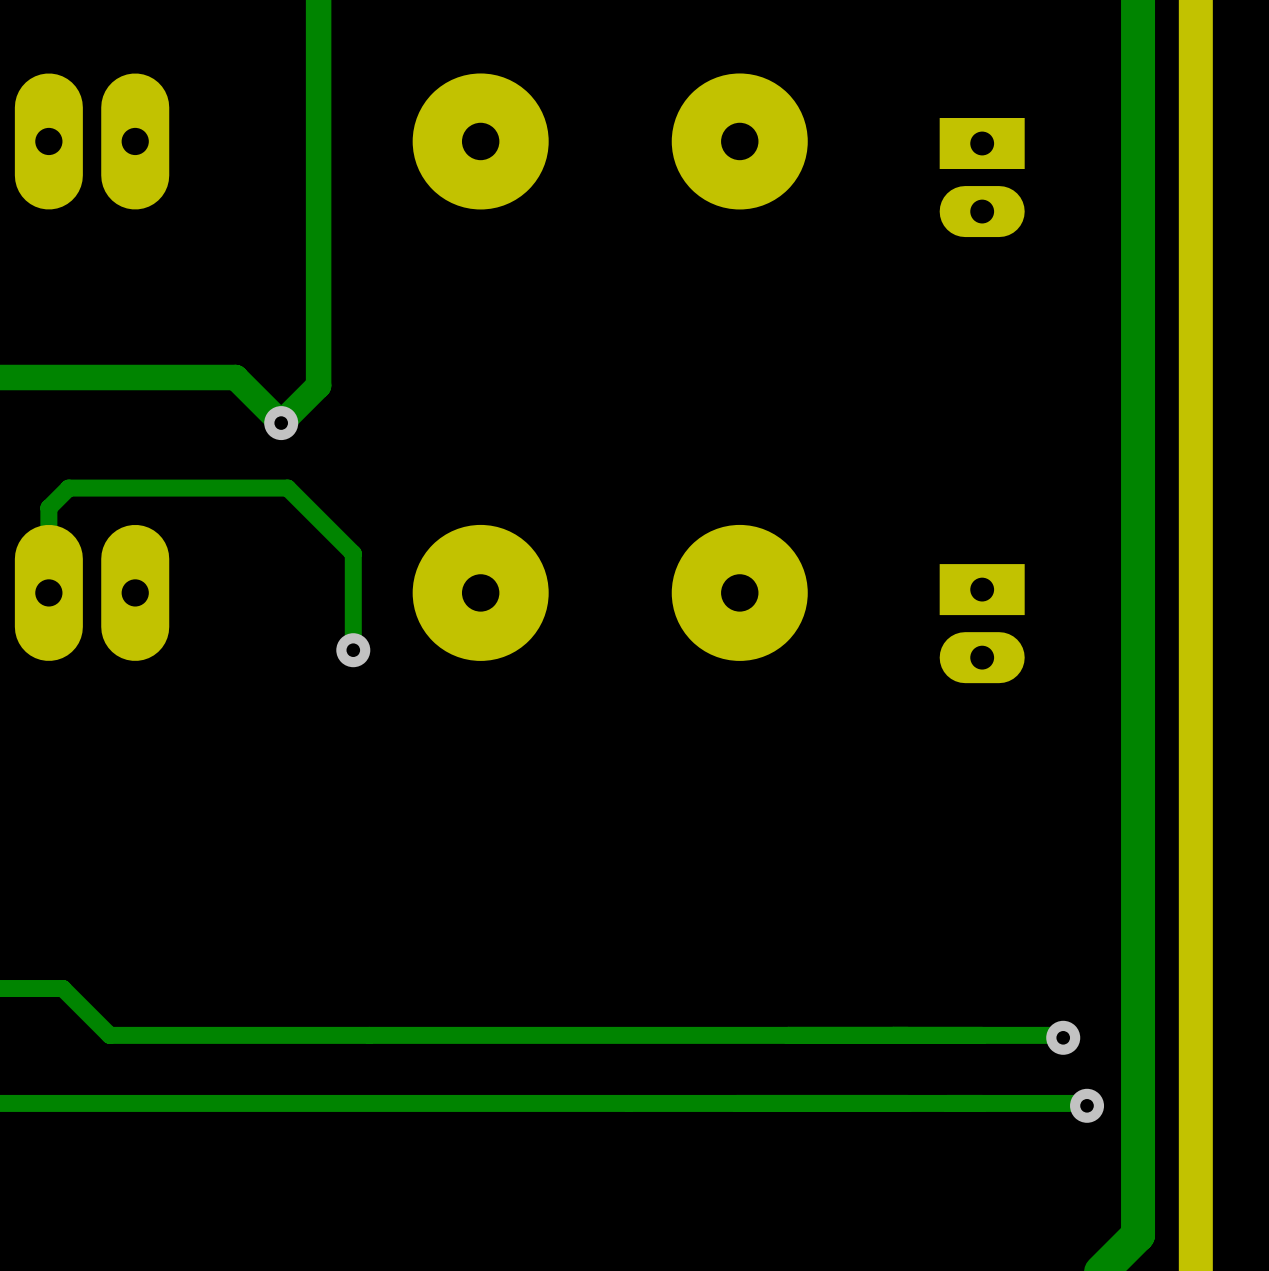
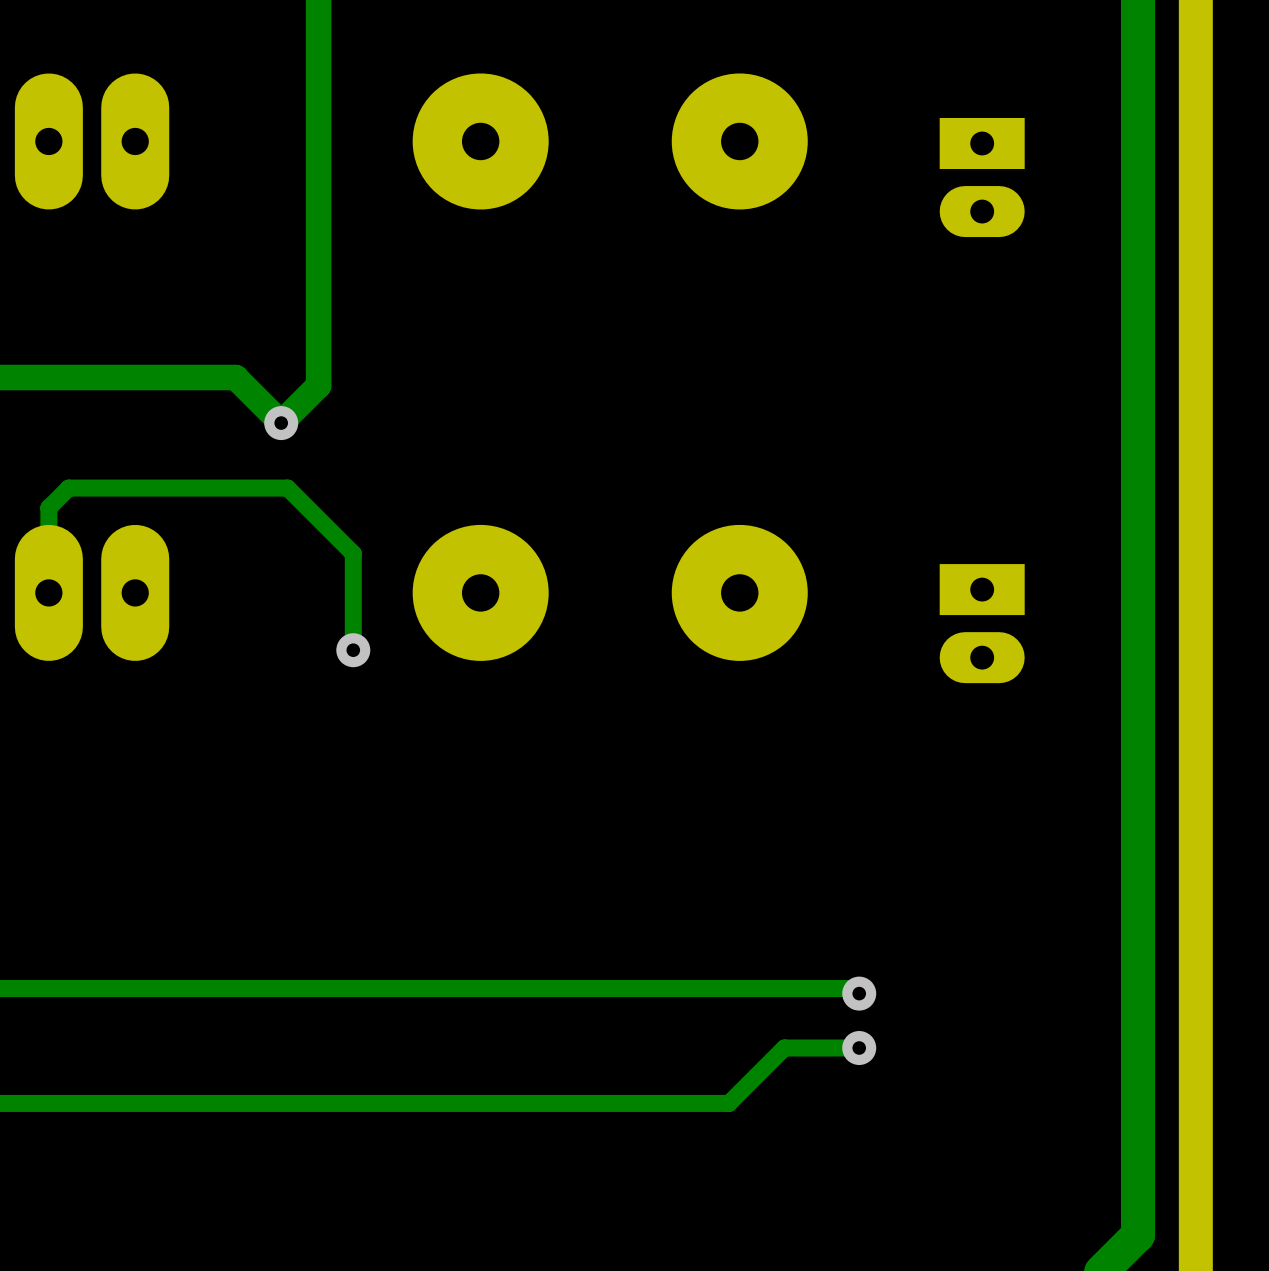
track: (62, 988) (109, 1035) (1060, 1035) (1063, 1037) -> (62, 988) (854, 988) (859, 993)
via: none -> (859, 993)
via: (1063, 1037) -> none
via: none -> (859, 1048)
track: (729, 1103) (1084, 1103) (1087, 1105) -> (729, 1103) (784, 1048) (859, 1048)
via: (1087, 1105) -> none

